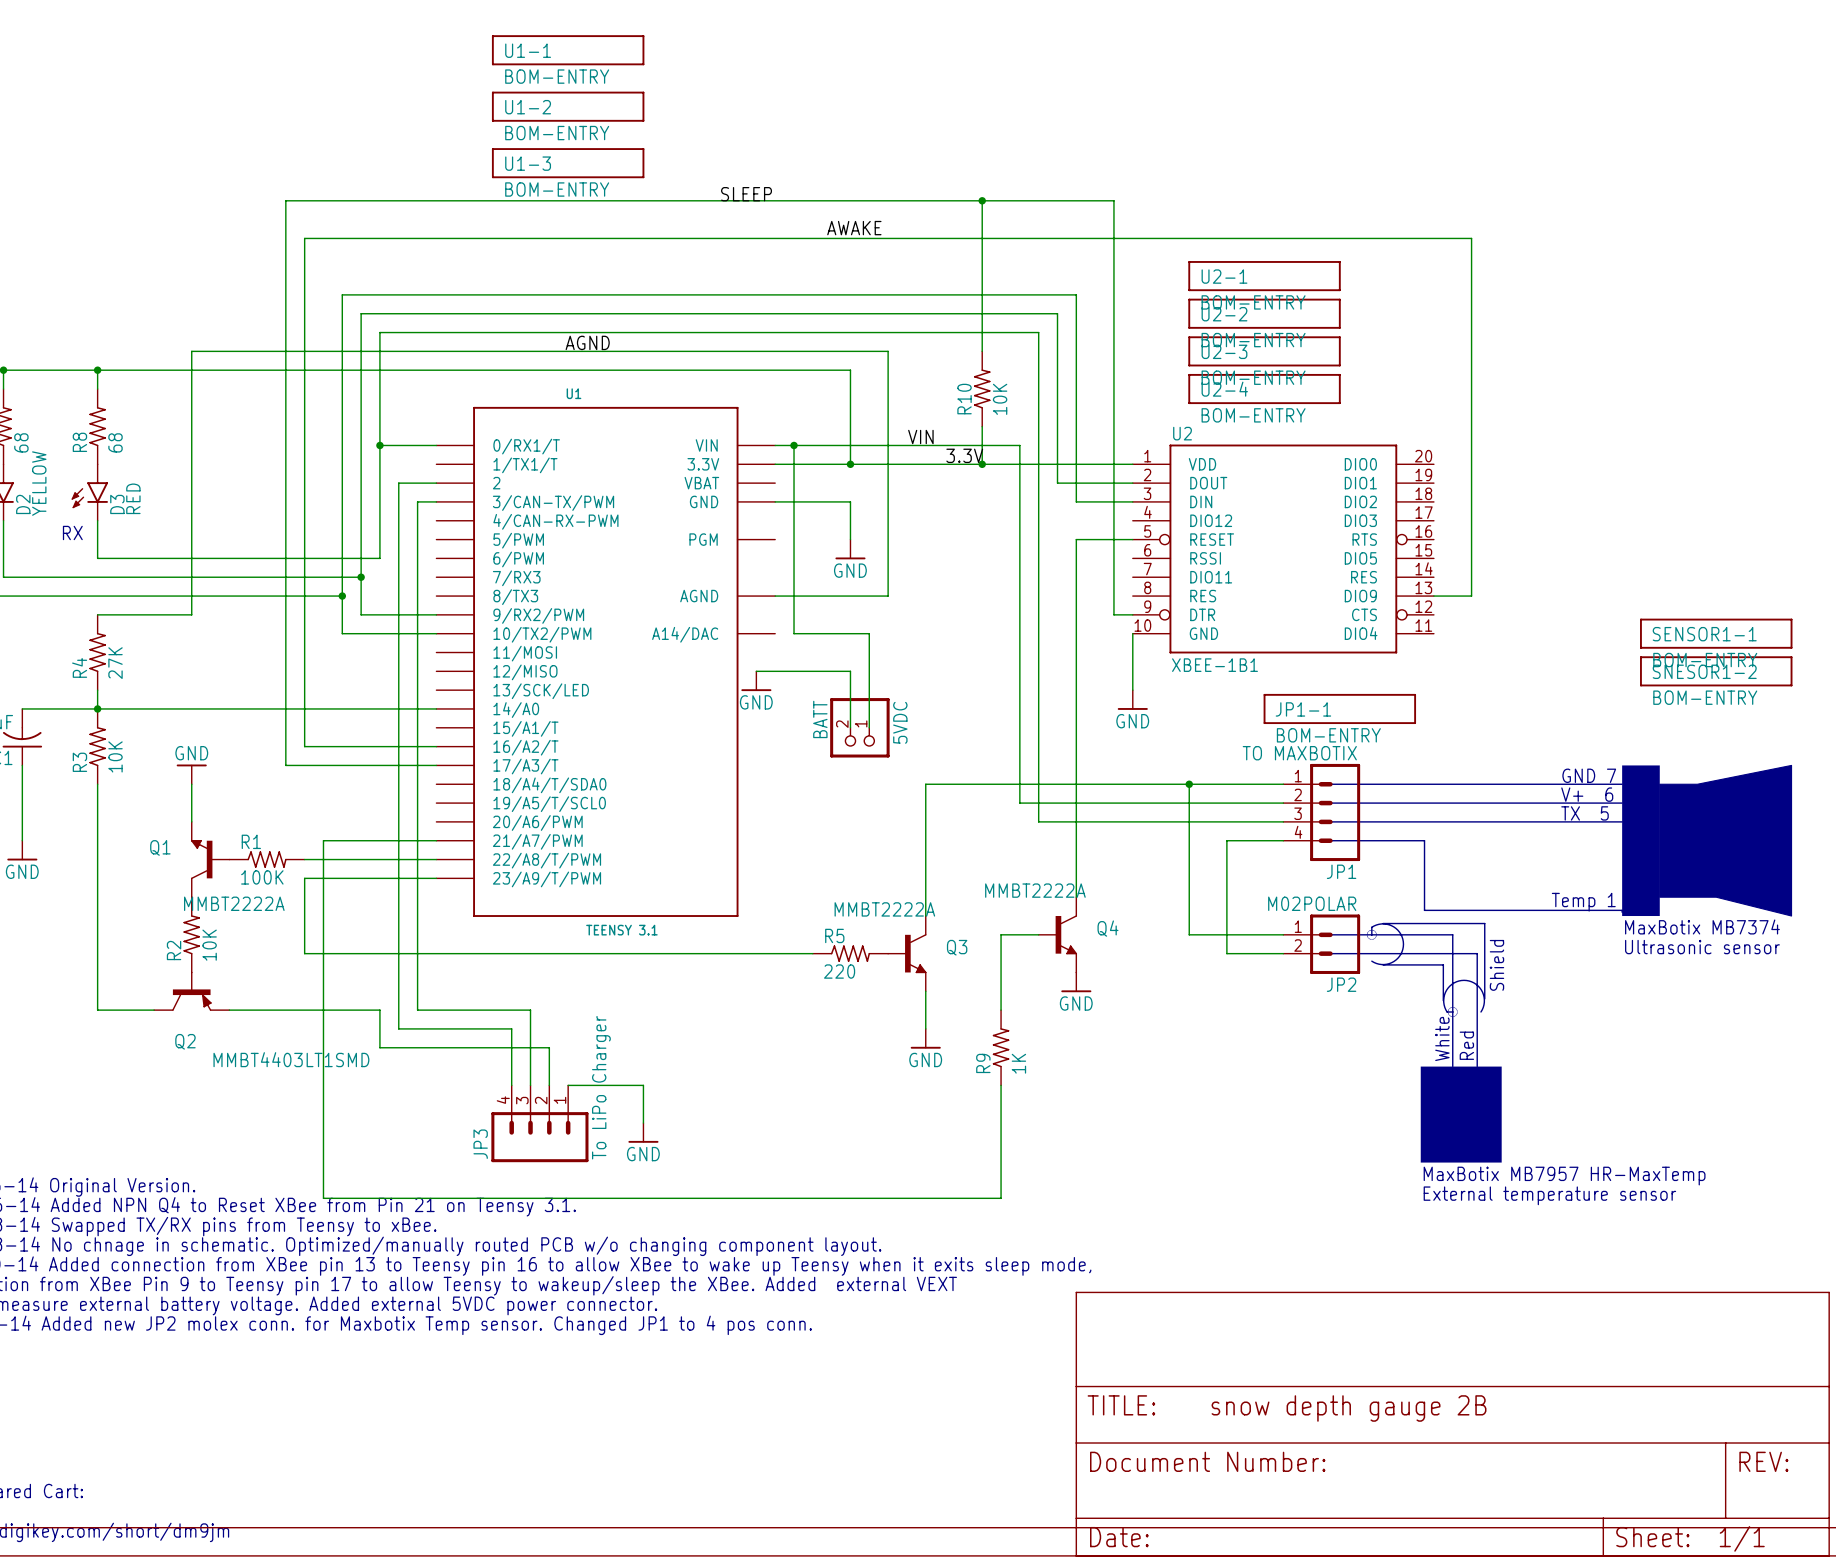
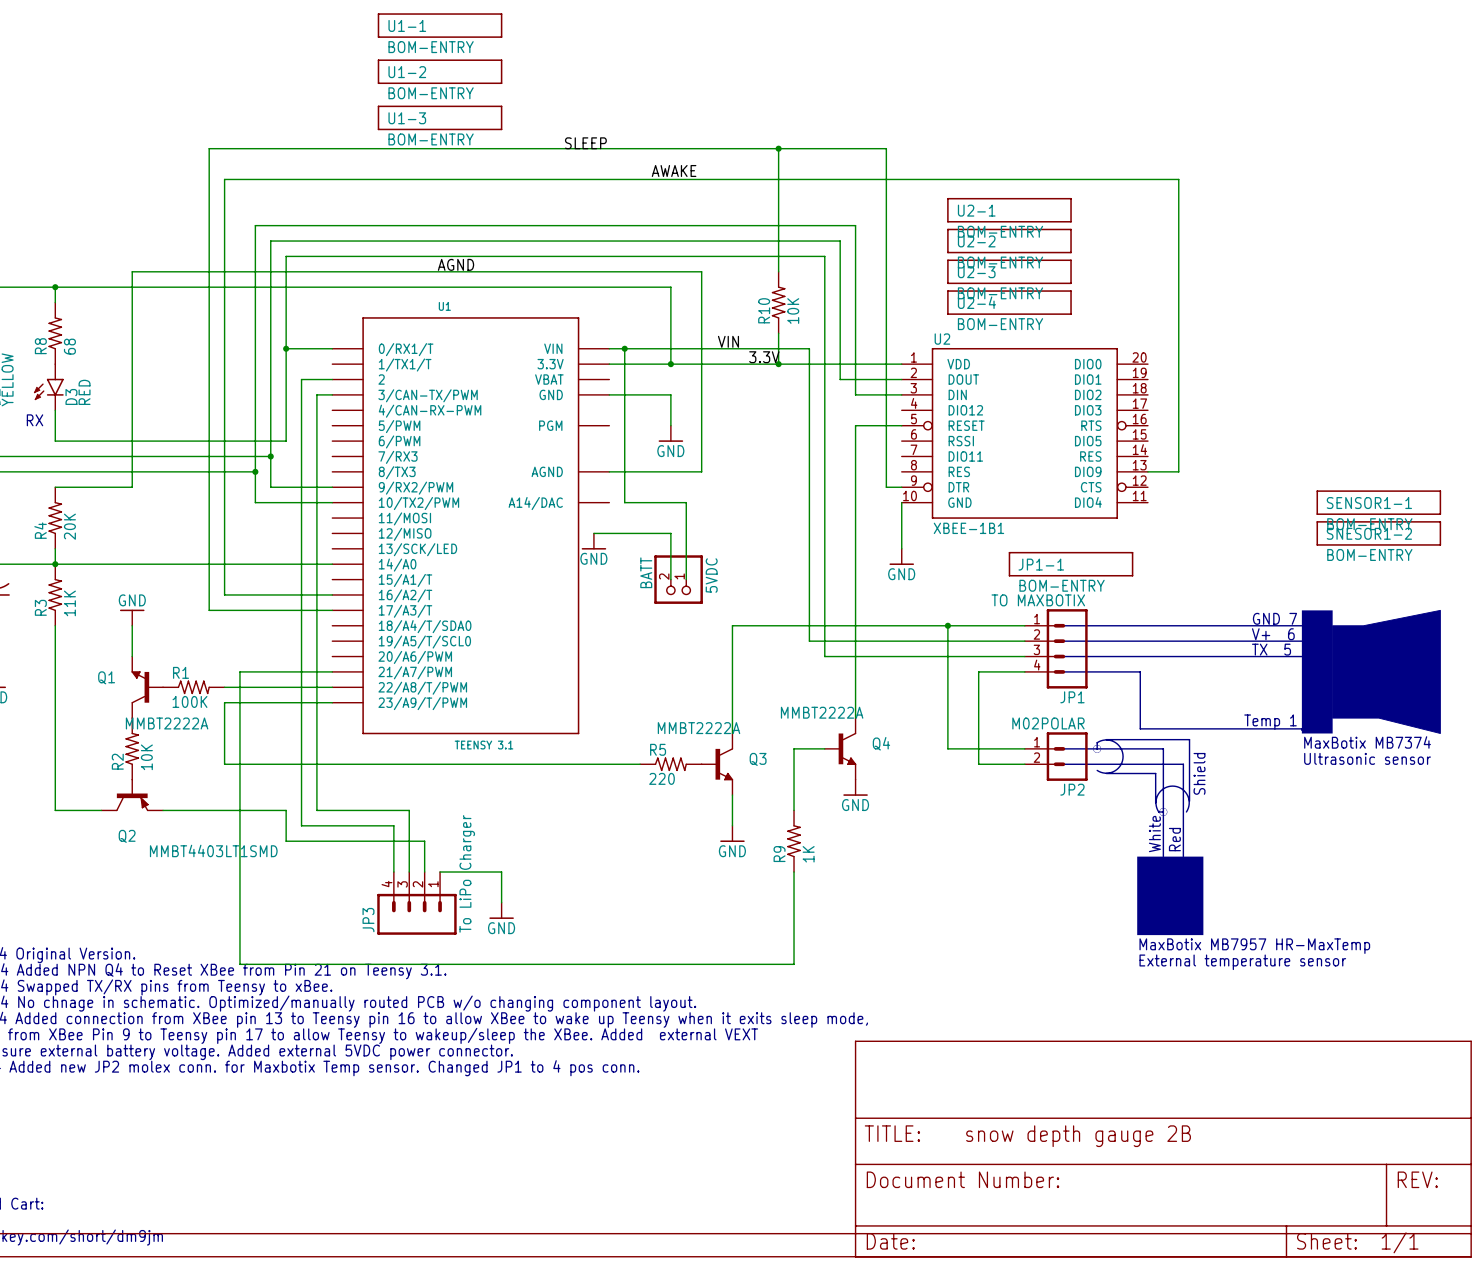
R4 value: 27K (115, 663) -> 20K (69, 526)
R3 value: 10K (115, 756) -> 11K (69, 603)

